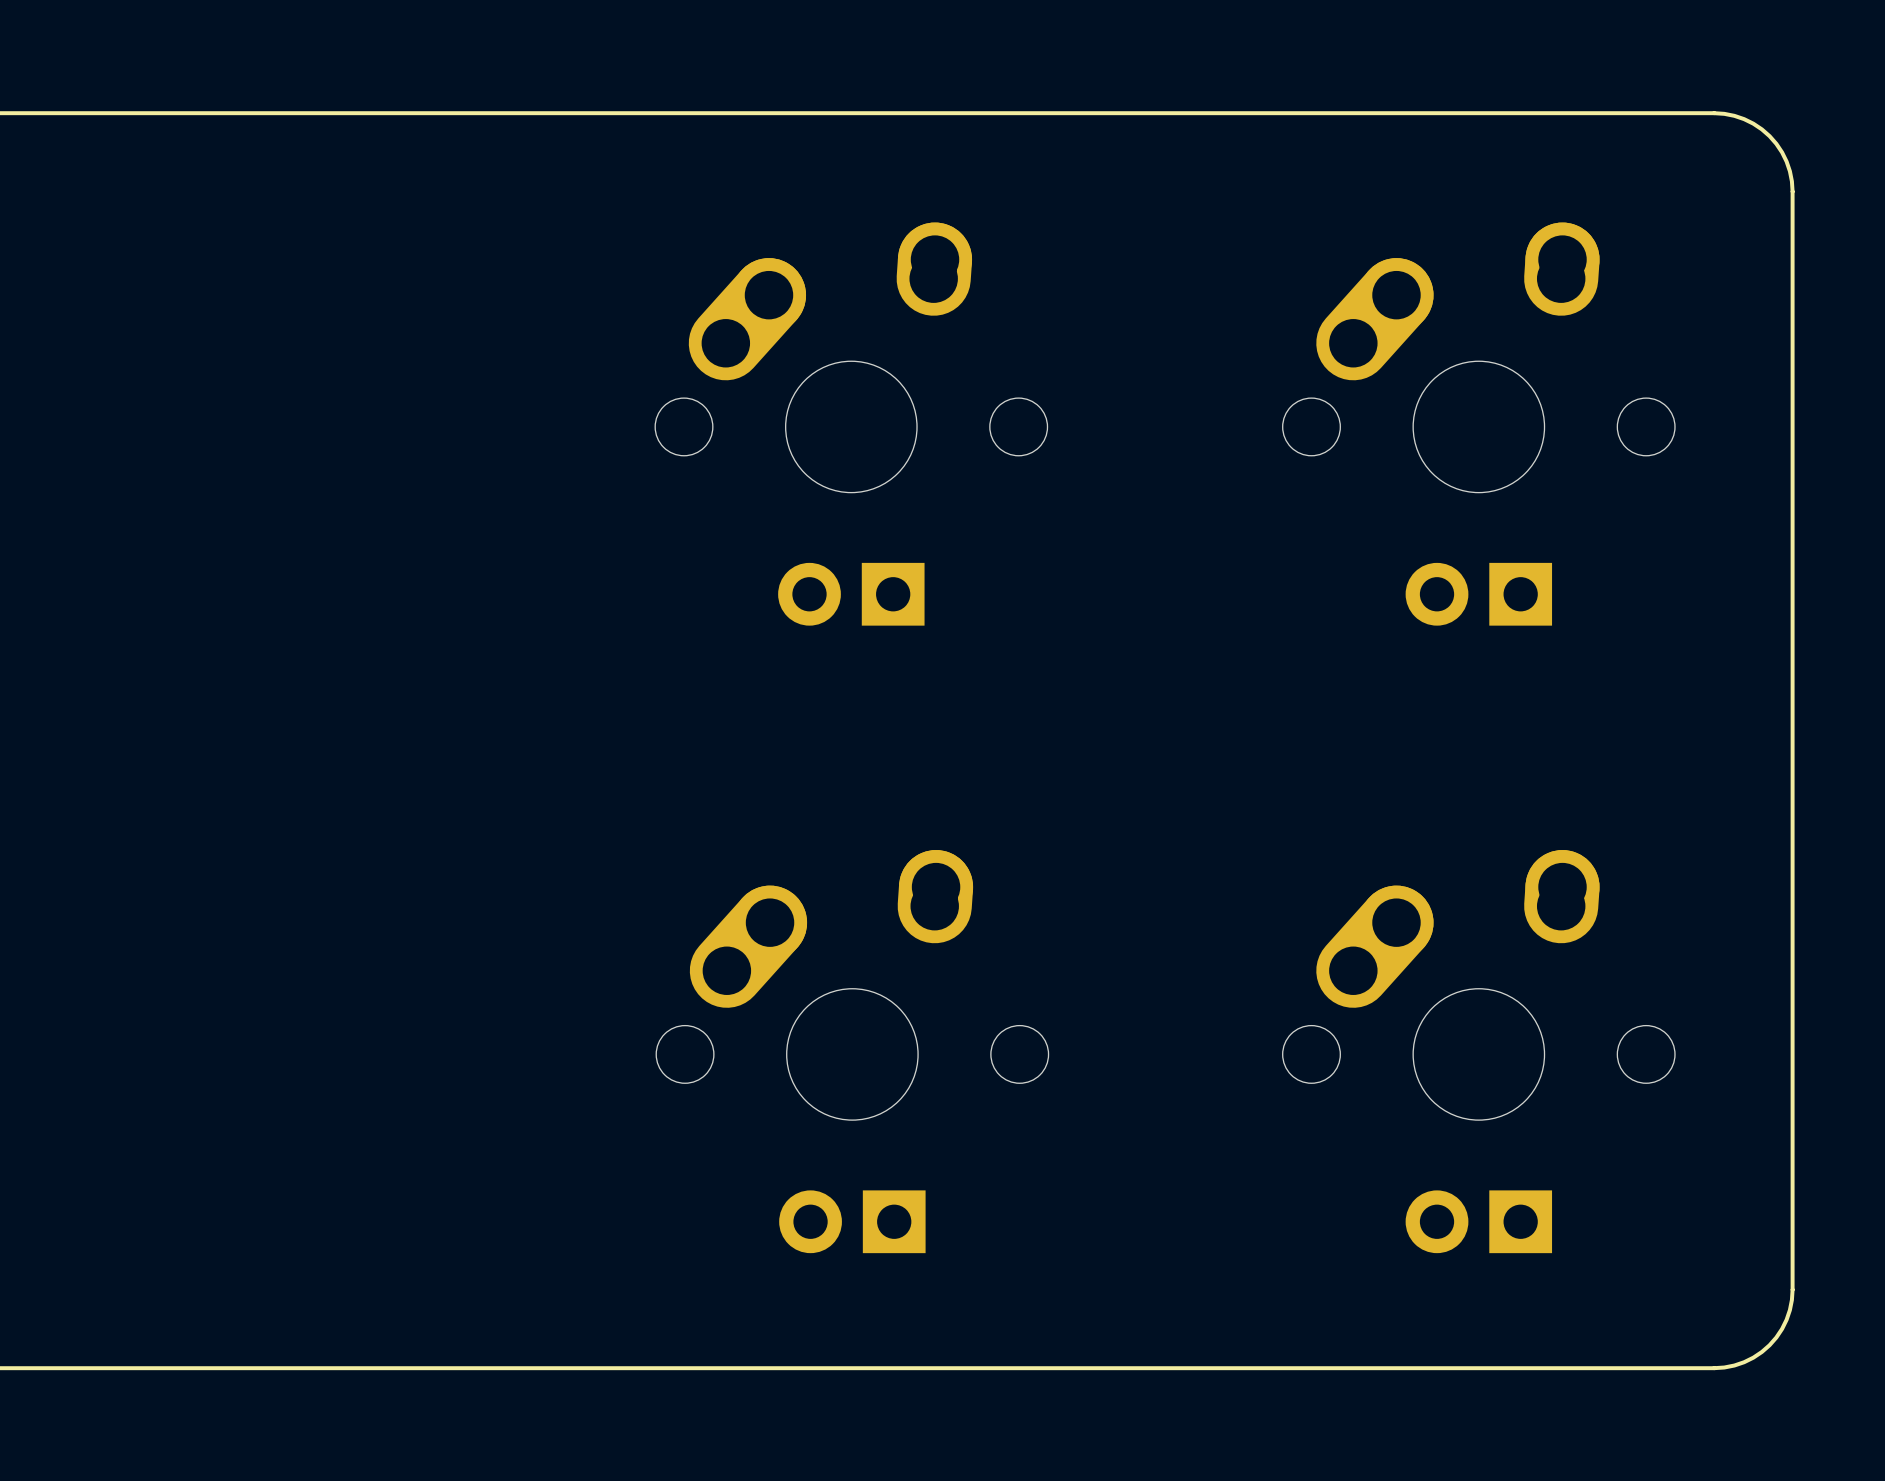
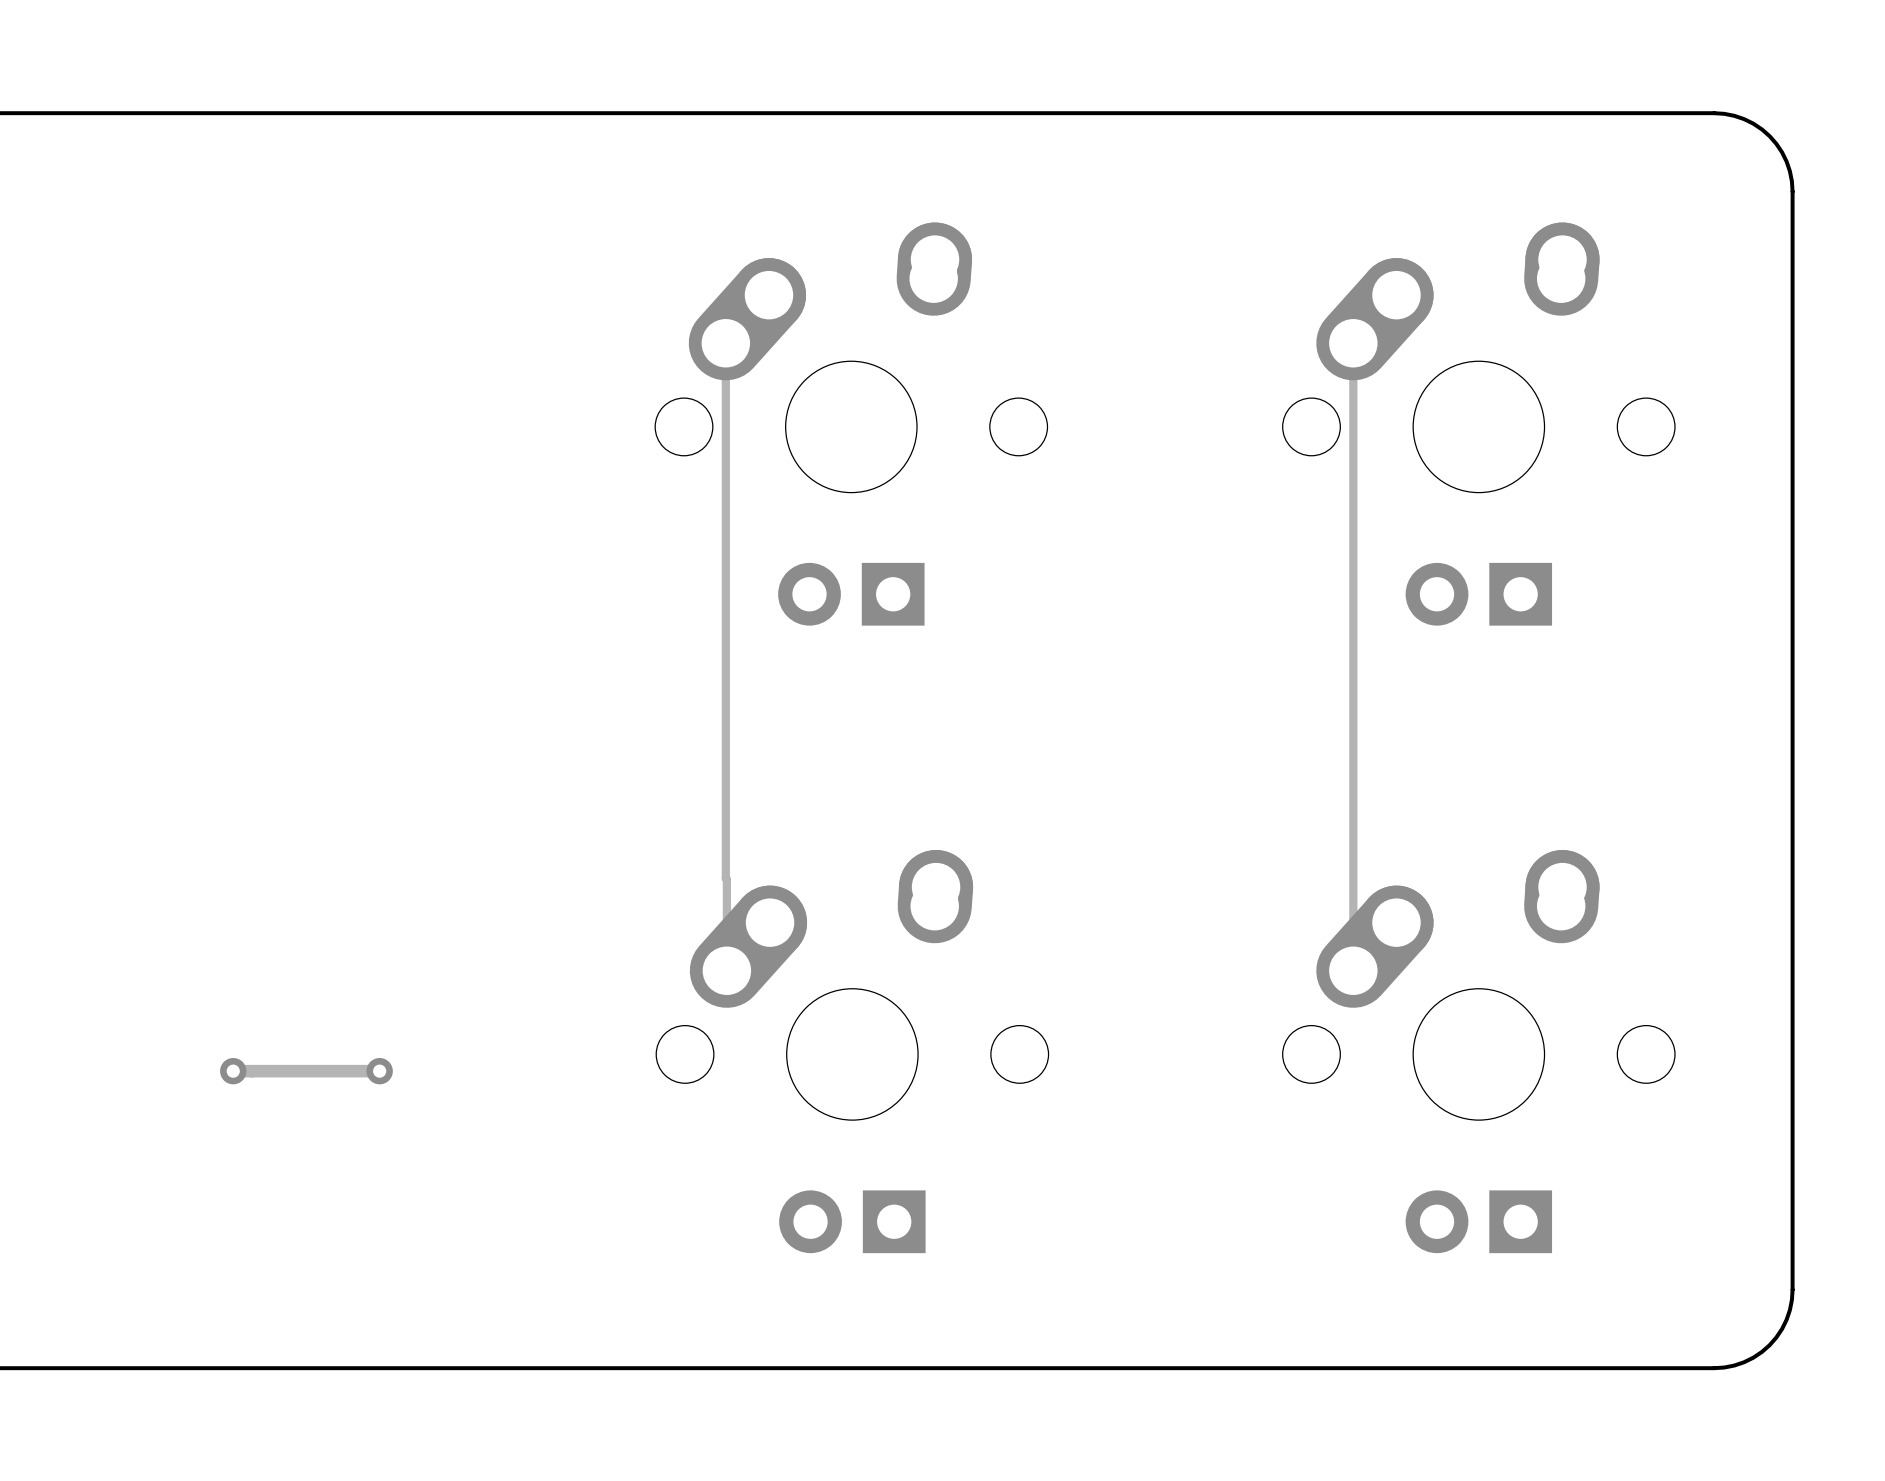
track: none -> (725, 343) (726, 970)
track: none -> (1353, 343) (1353, 970)
track: none -> (233, 1071) (379, 1071)
via: none -> (233, 1071)
via: none -> (379, 1071)

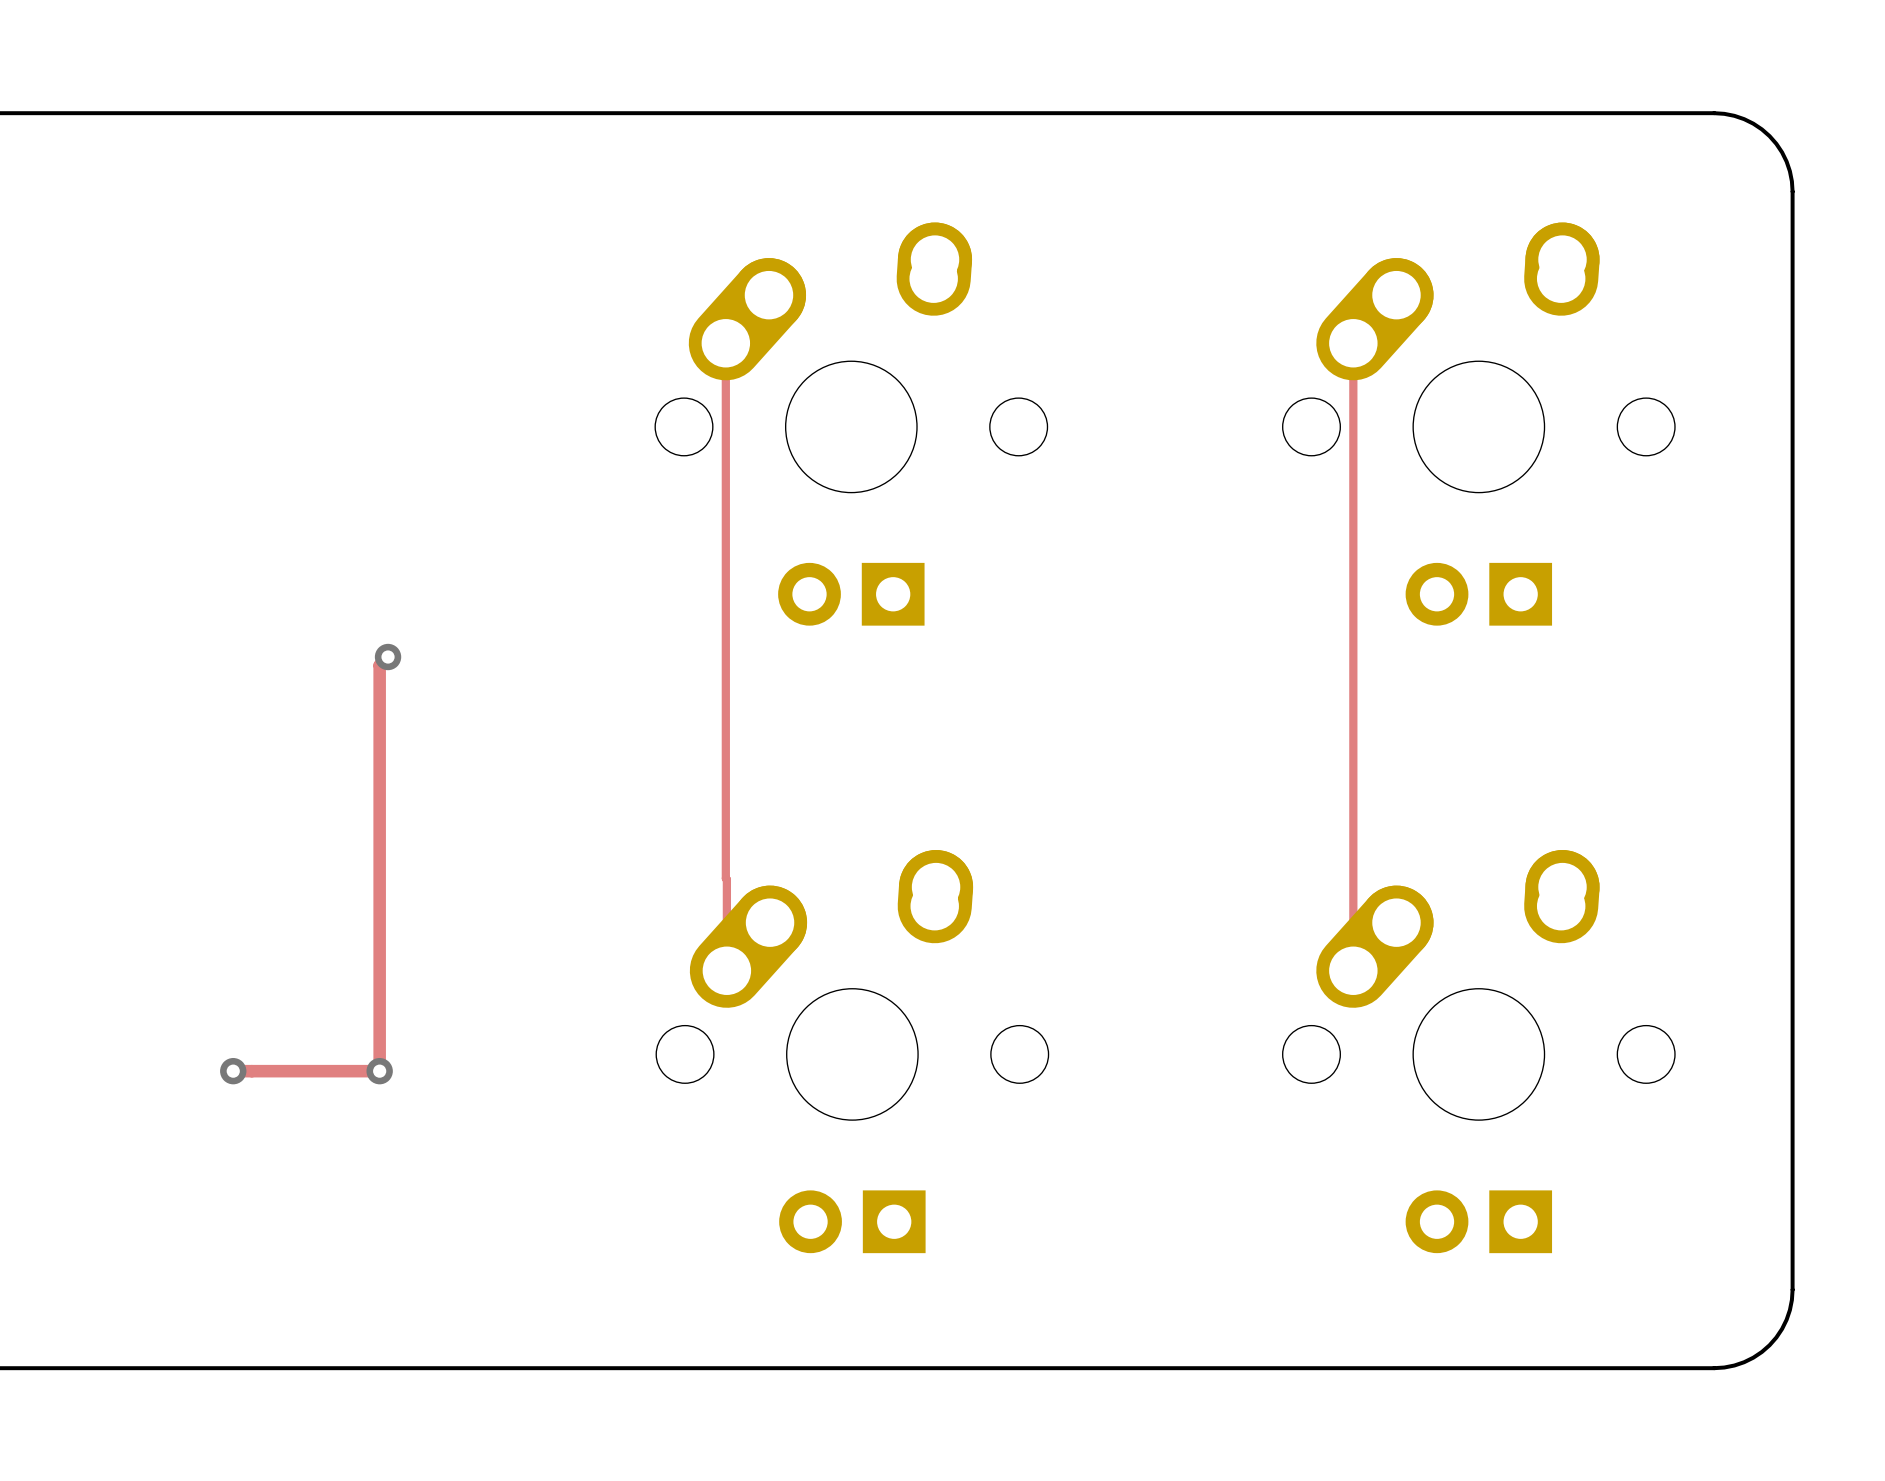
track: none -> (388, 657) (379, 665) (379, 1071)
via: none -> (388, 657)

